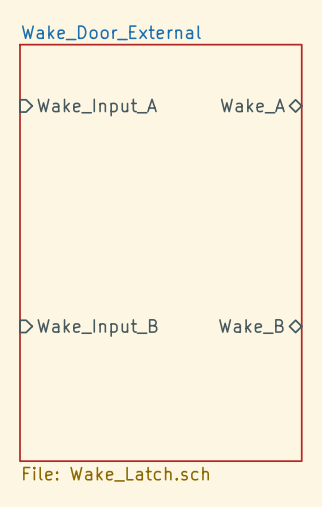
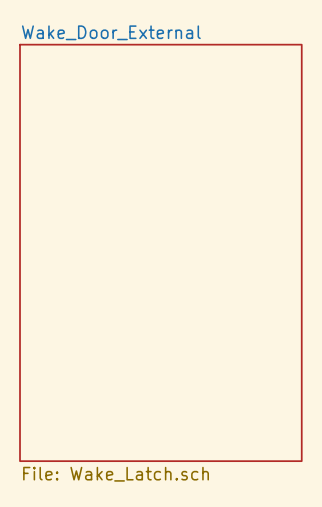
sheet pin: Wake_A (252, 106) -> none
sheet pin: Wake_Input_A (97, 107) -> none
sheet pin: Wake_B (251, 326) -> none
sheet pin: Wake_Input_B (97, 327) -> none

